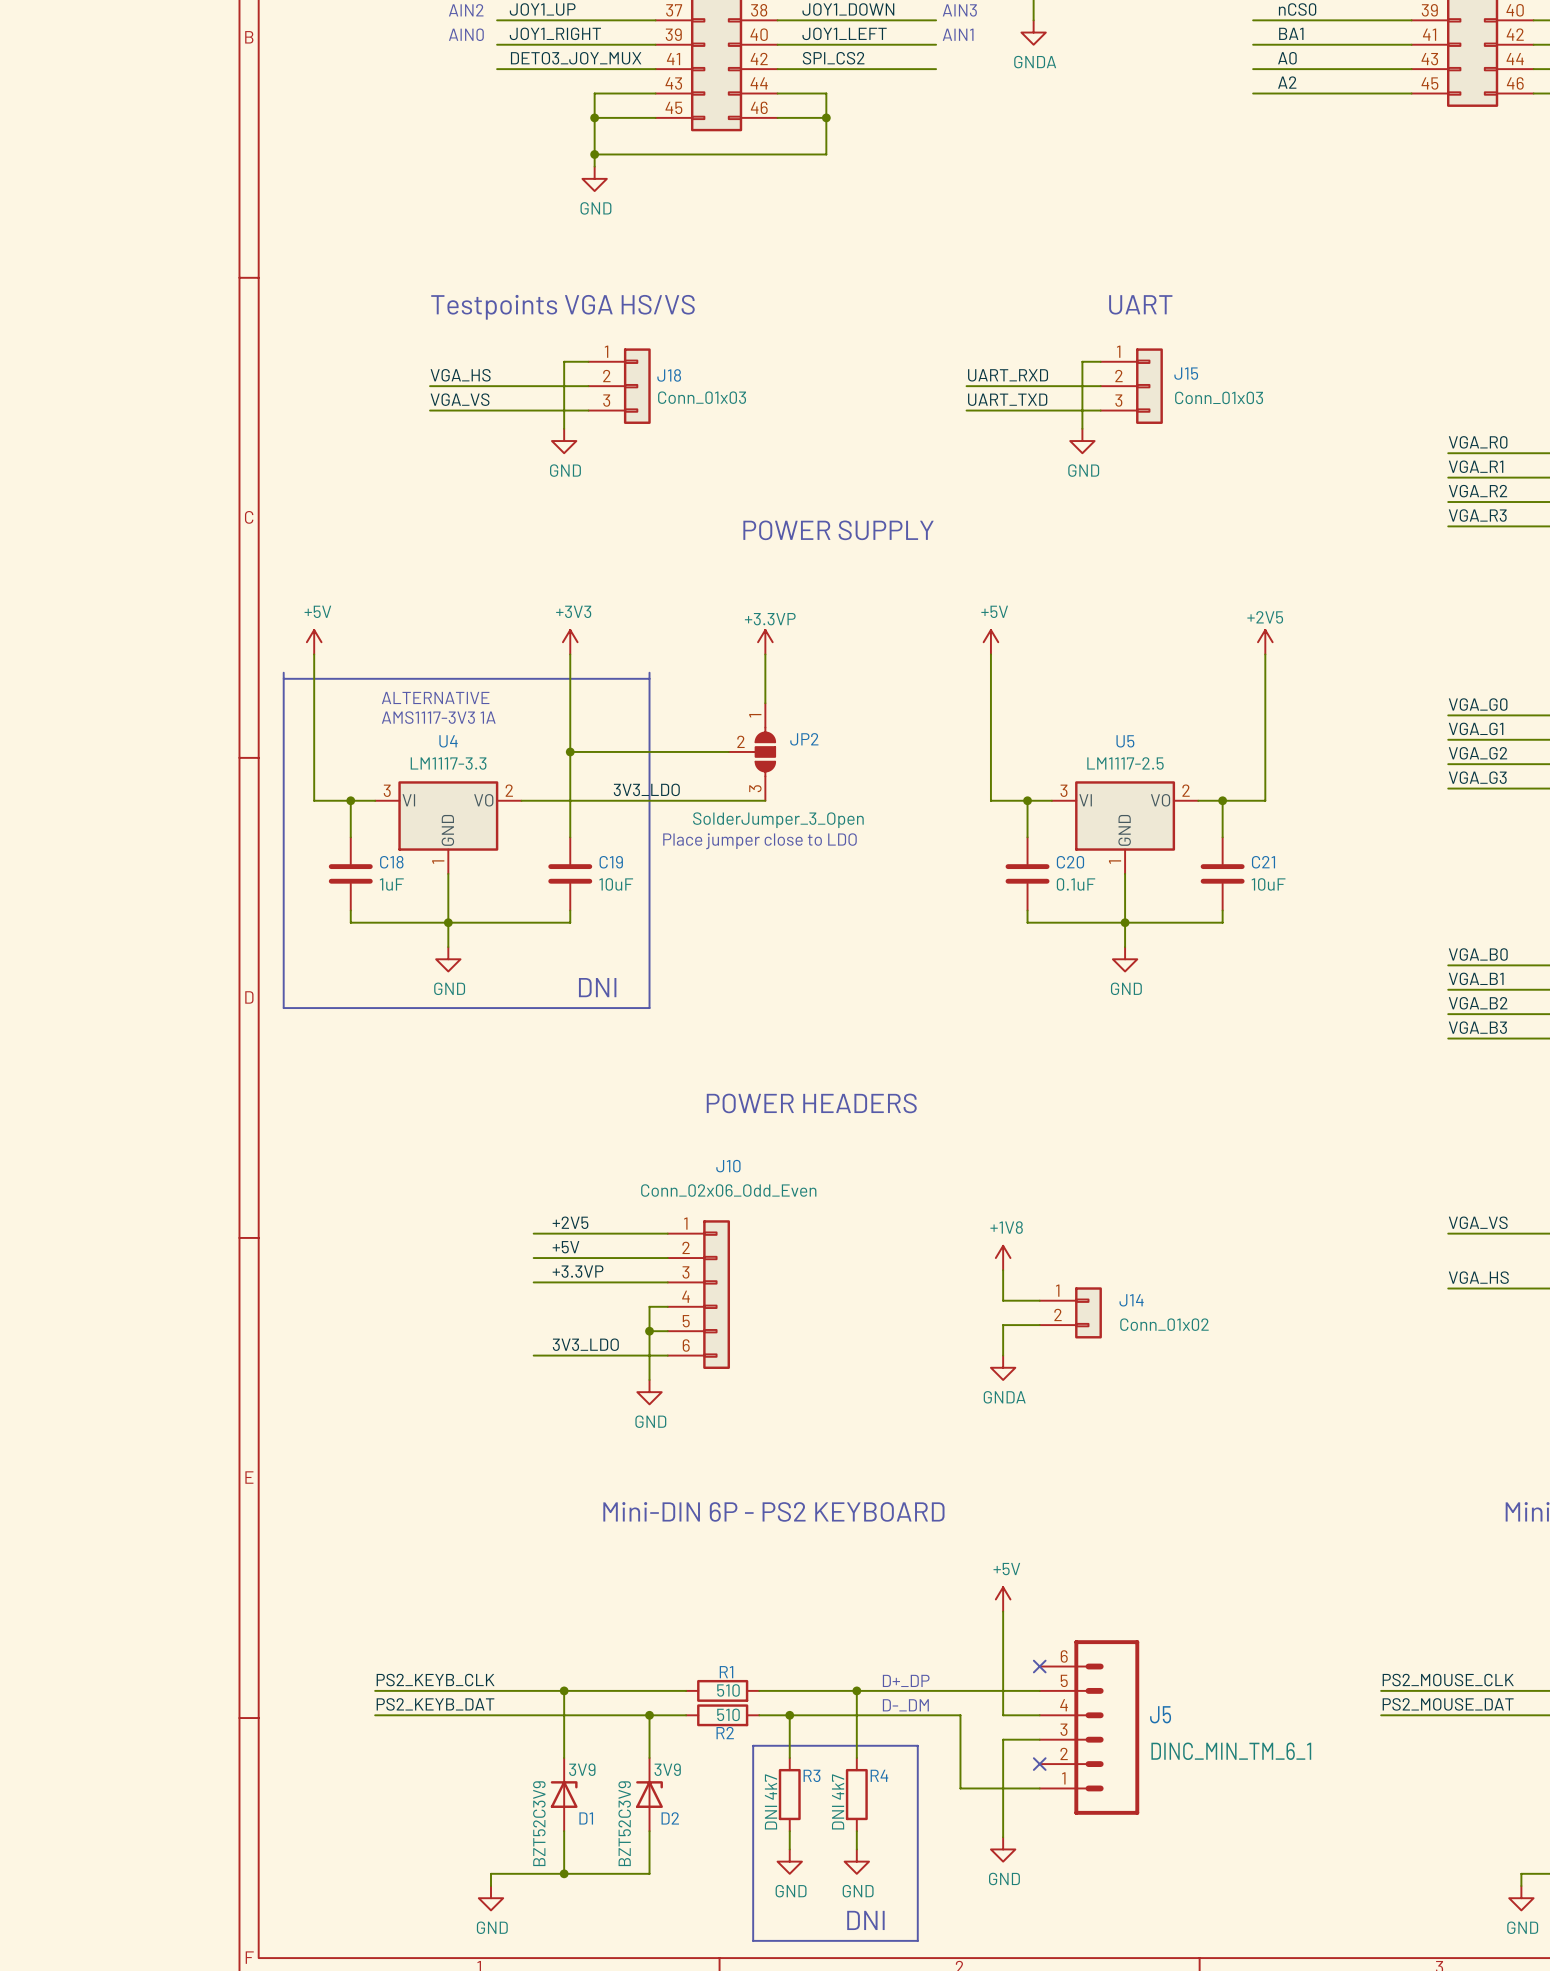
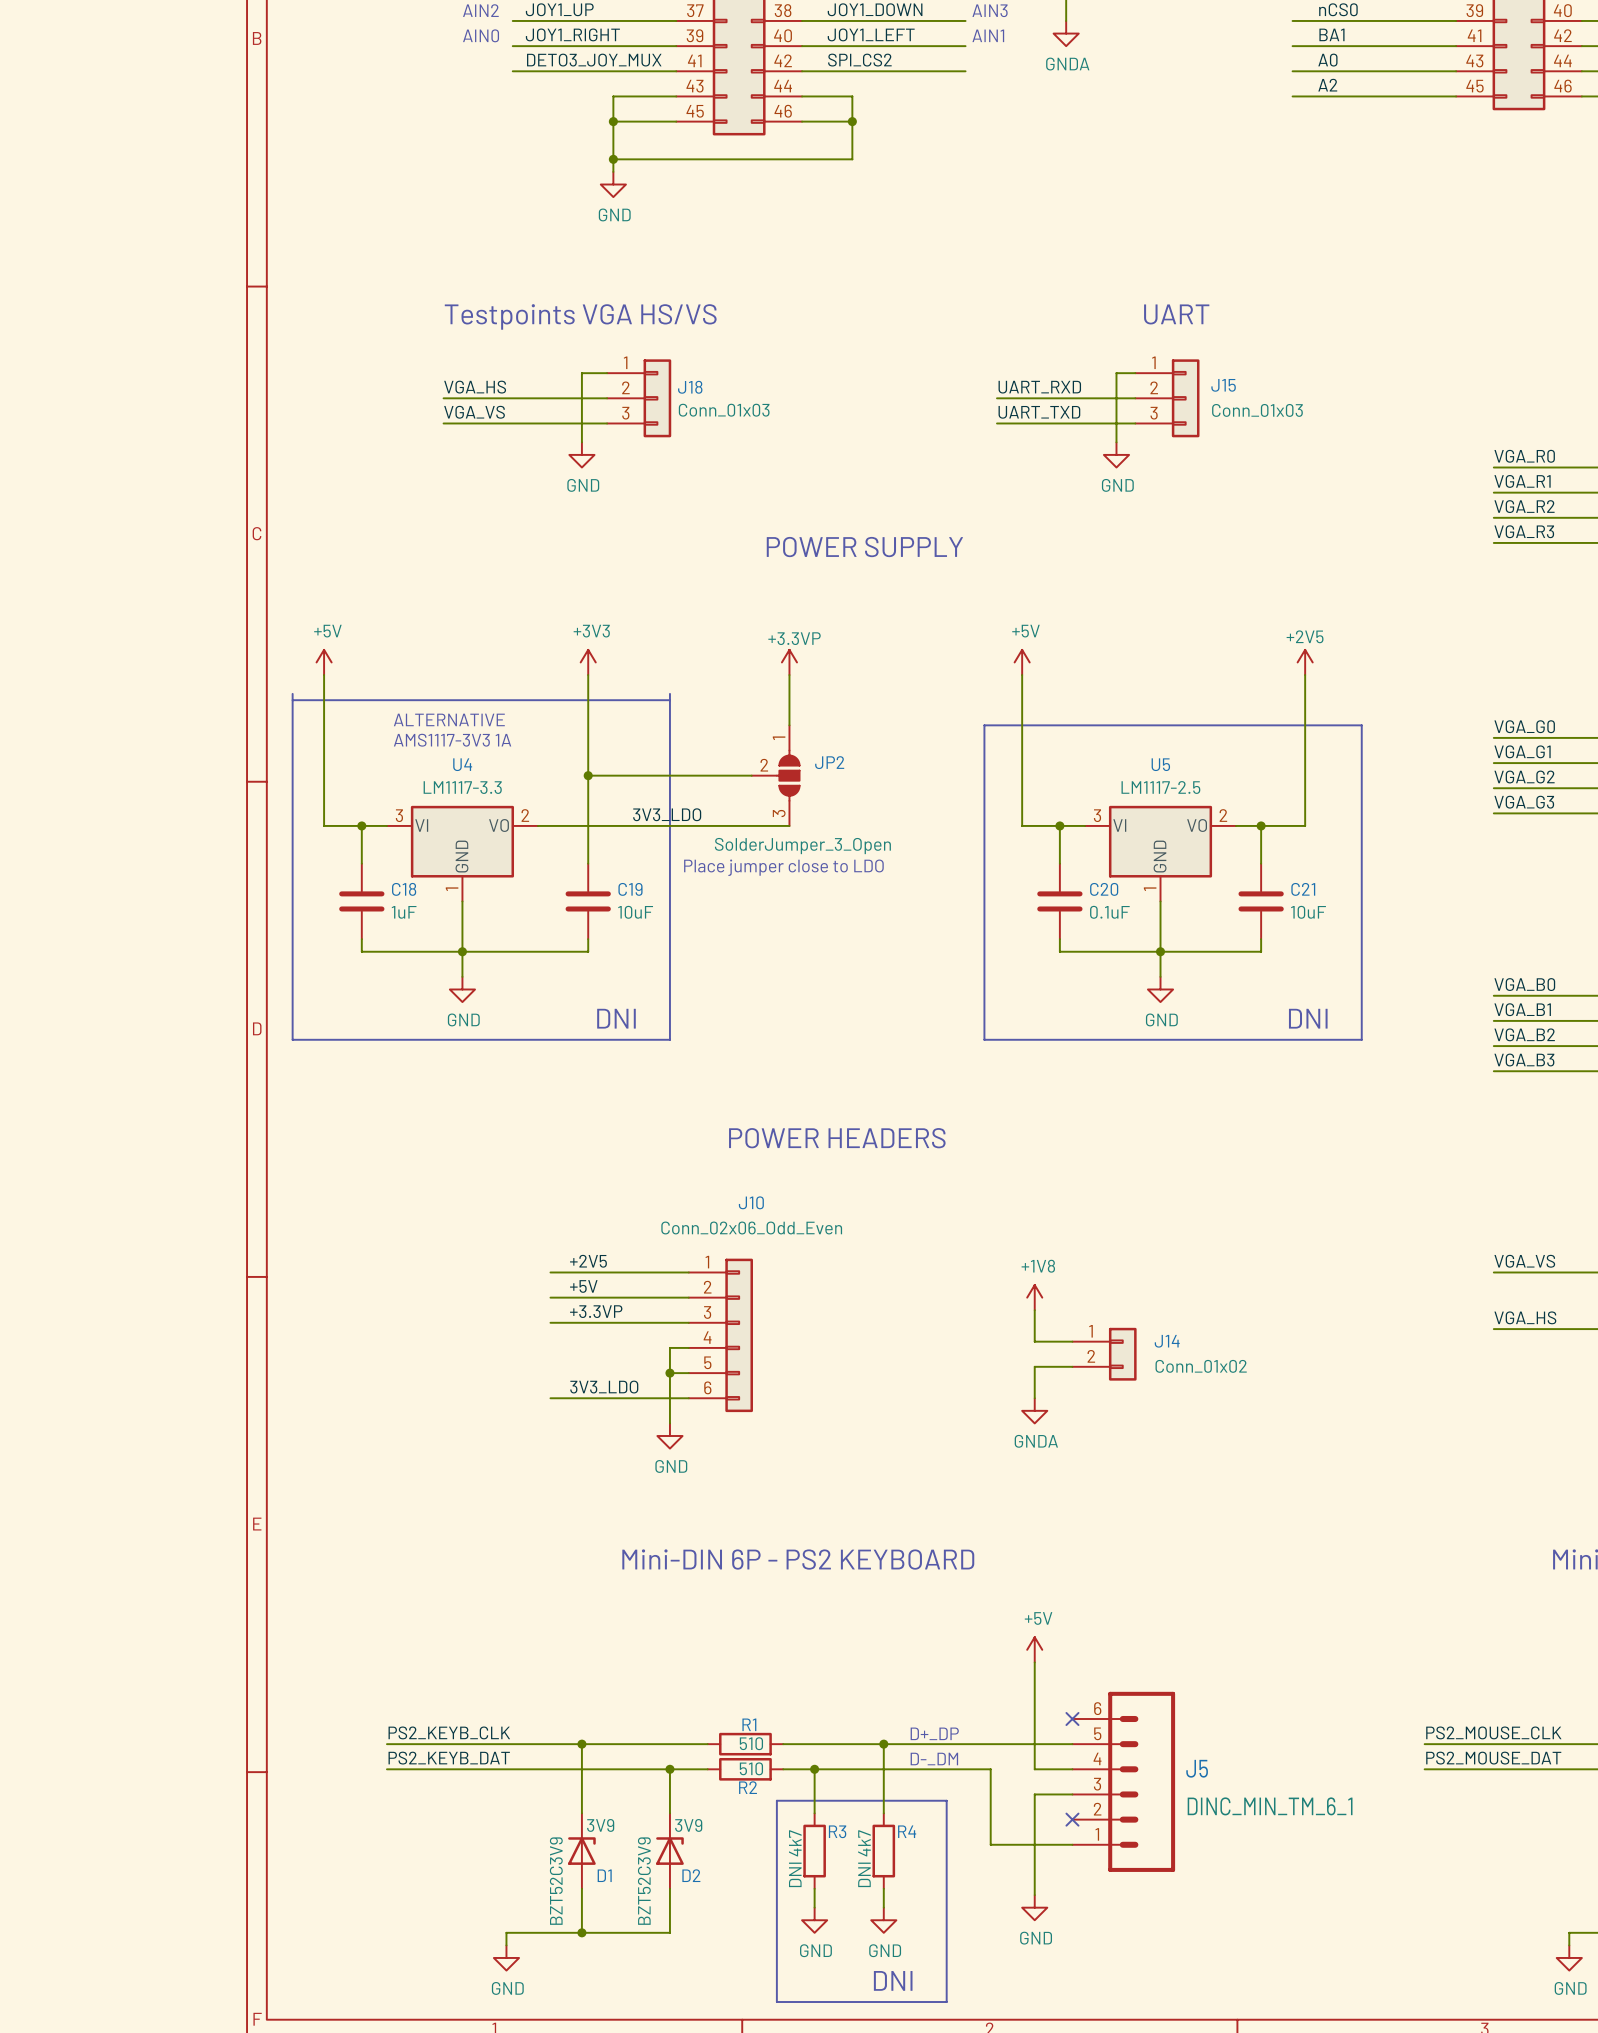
line: none -> (984, 725) (984, 1039) (1361, 1039) (1361, 725) (984, 725)
text: none -> DNI (1308, 1018)

